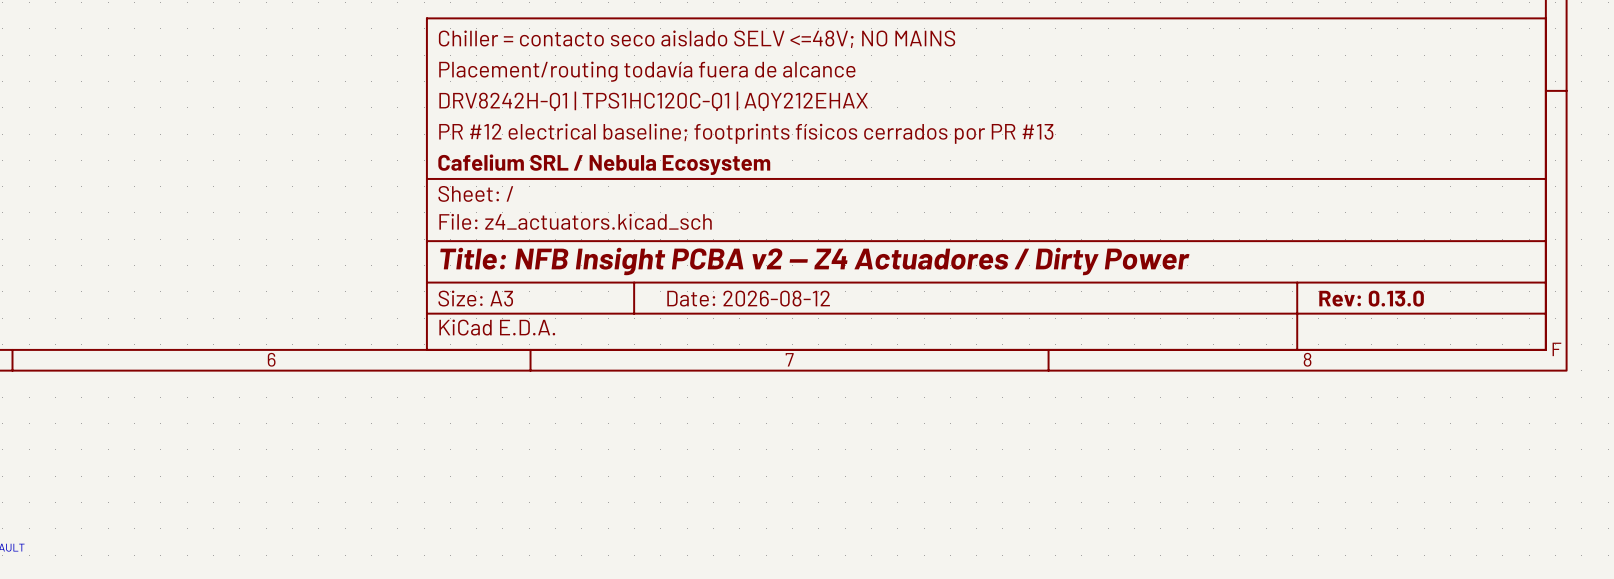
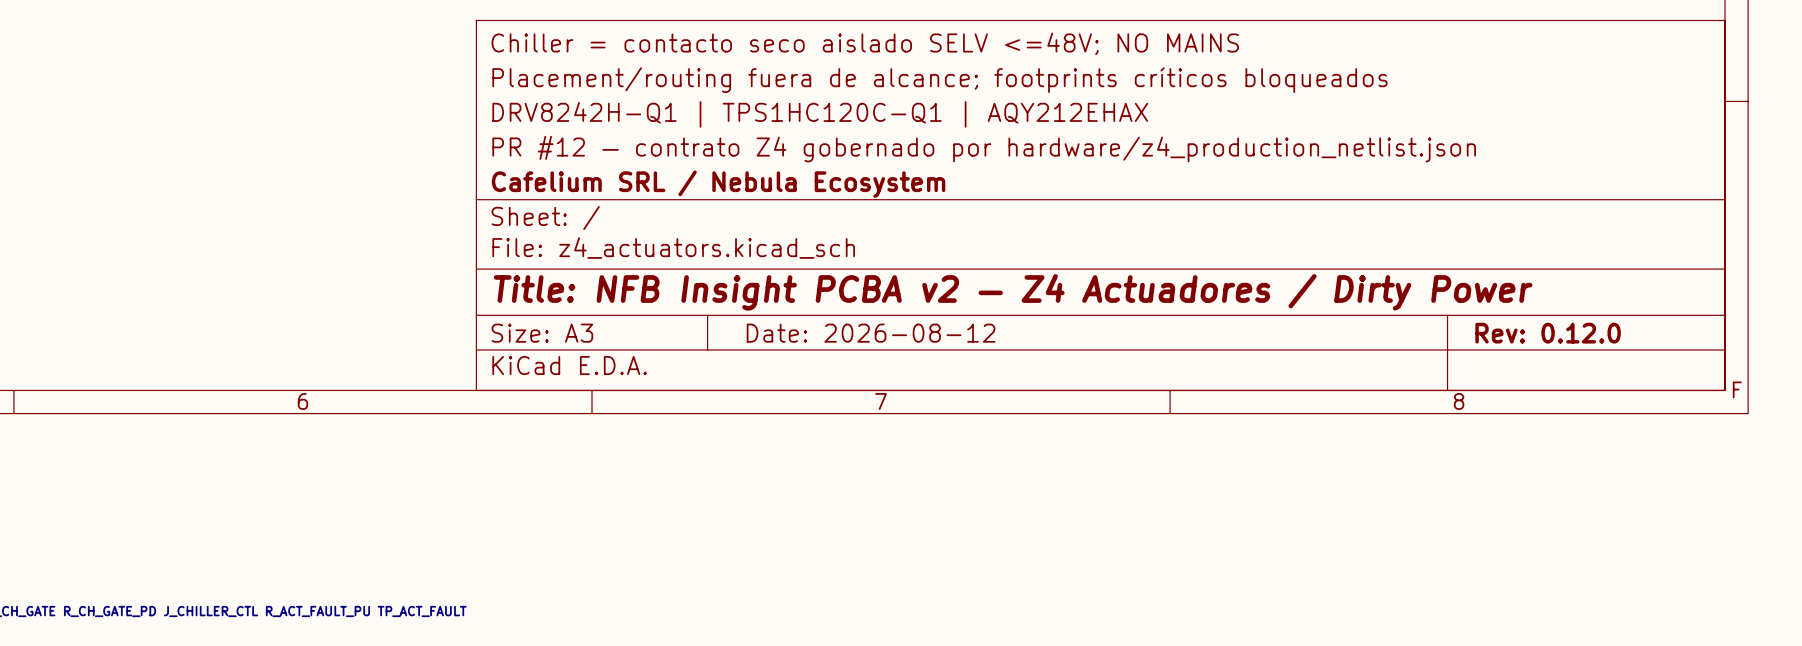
title block: Placement/routing todavía fuera de alcance (647, 71) -> Placement/routing fuera de alcance; footprints críticos bloqueados (940, 80)
title block: PR #12 electrical baseline; footprints físicos cerrados por PR #13 (746, 133) -> PR #12 — contrato Z4 gobernado por hardware/z4_production_netlist.json (984, 149)
title block: Rev: 0.13.0 (1371, 298) -> Rev: 0.12.0 (1548, 333)

